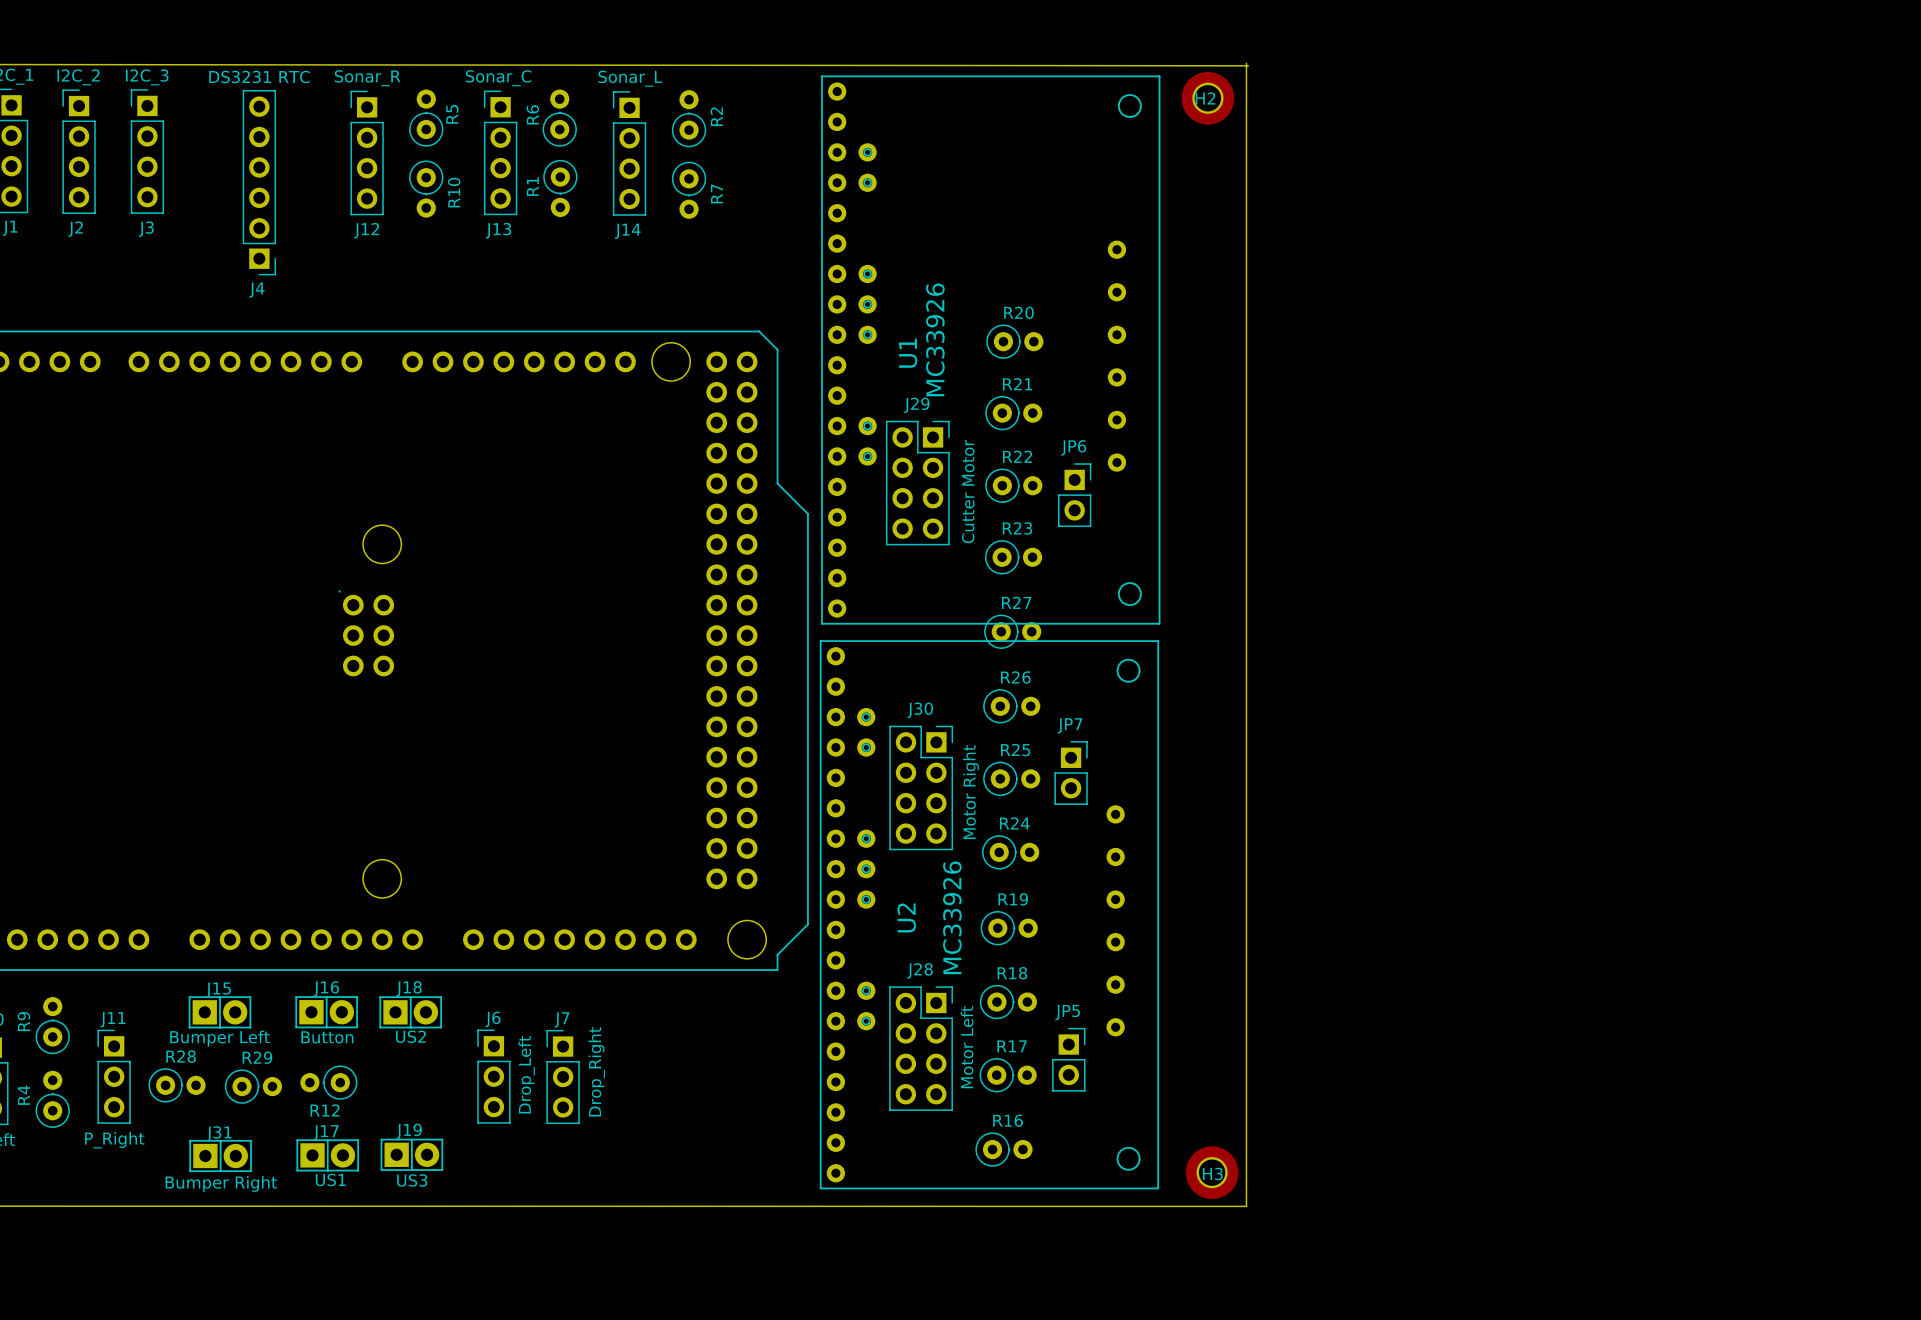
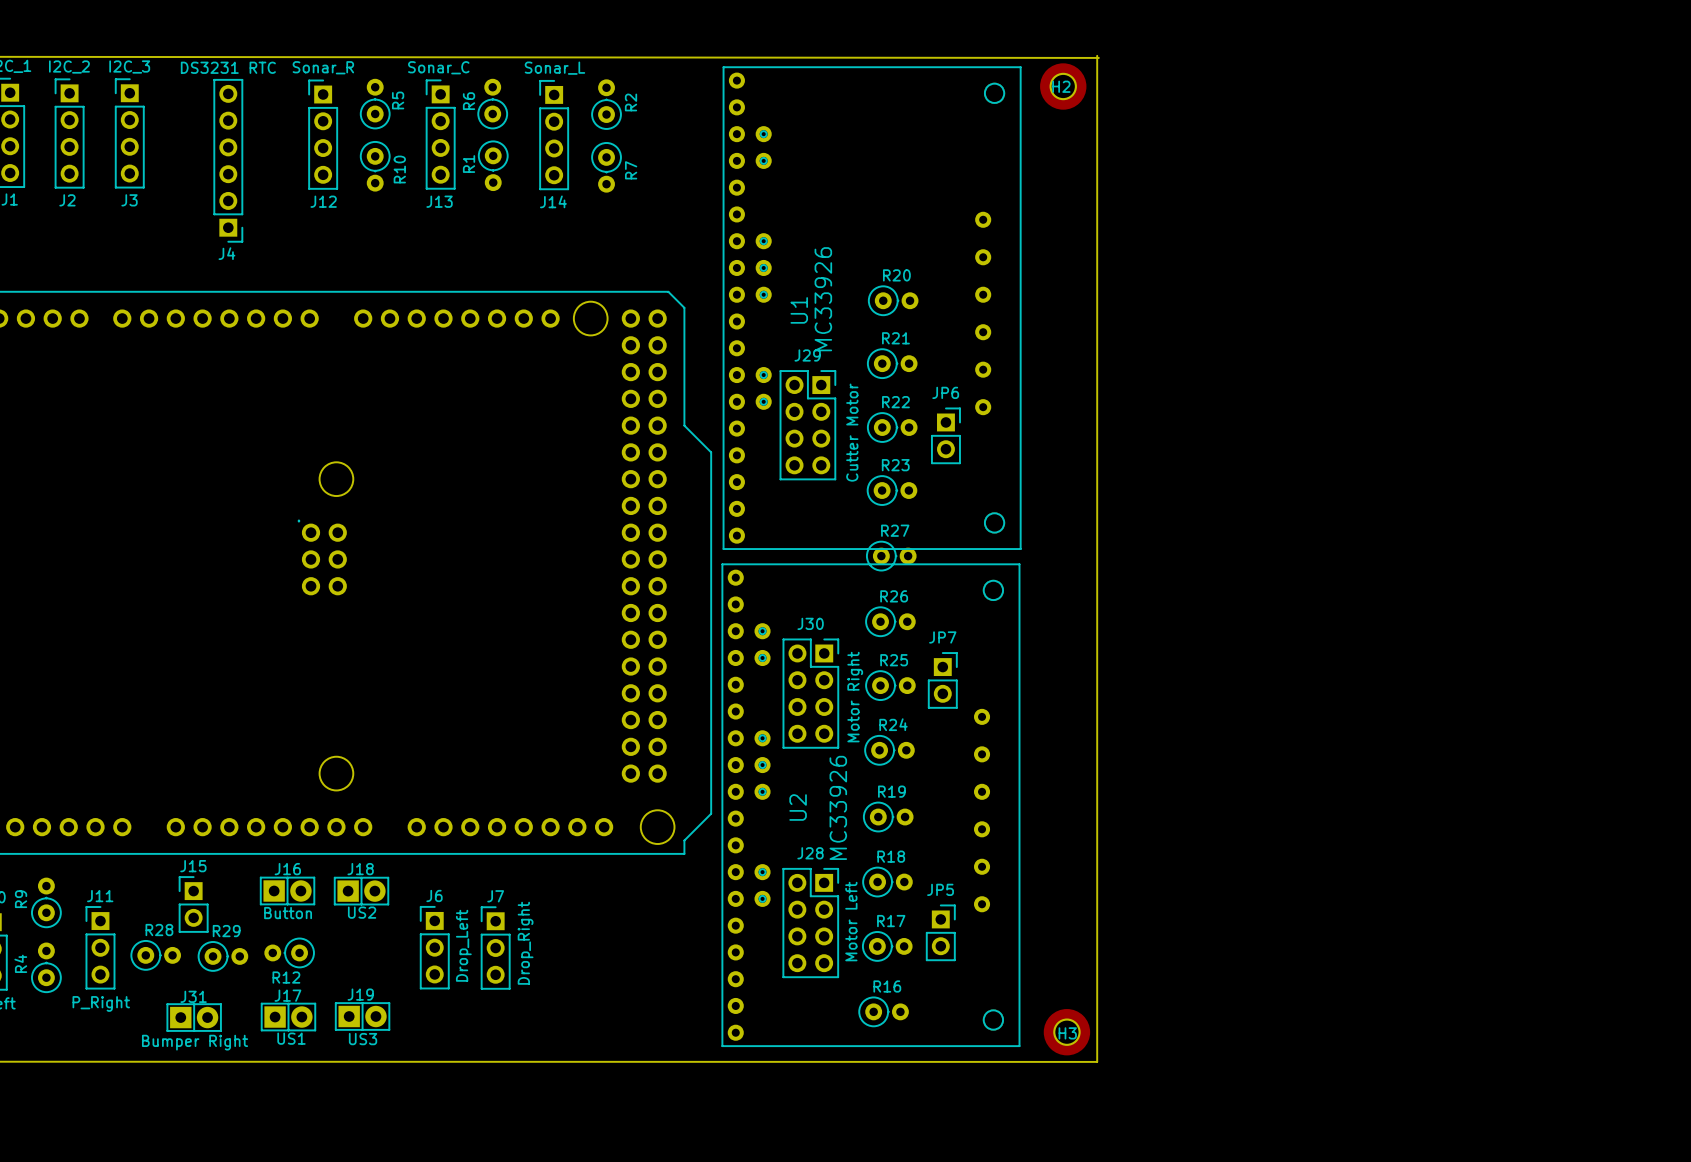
J15 footprint: [188, 996, 252, 1029] -> [178, 876, 209, 933]
J15 value: Bumper Left (219, 1038) -> none

